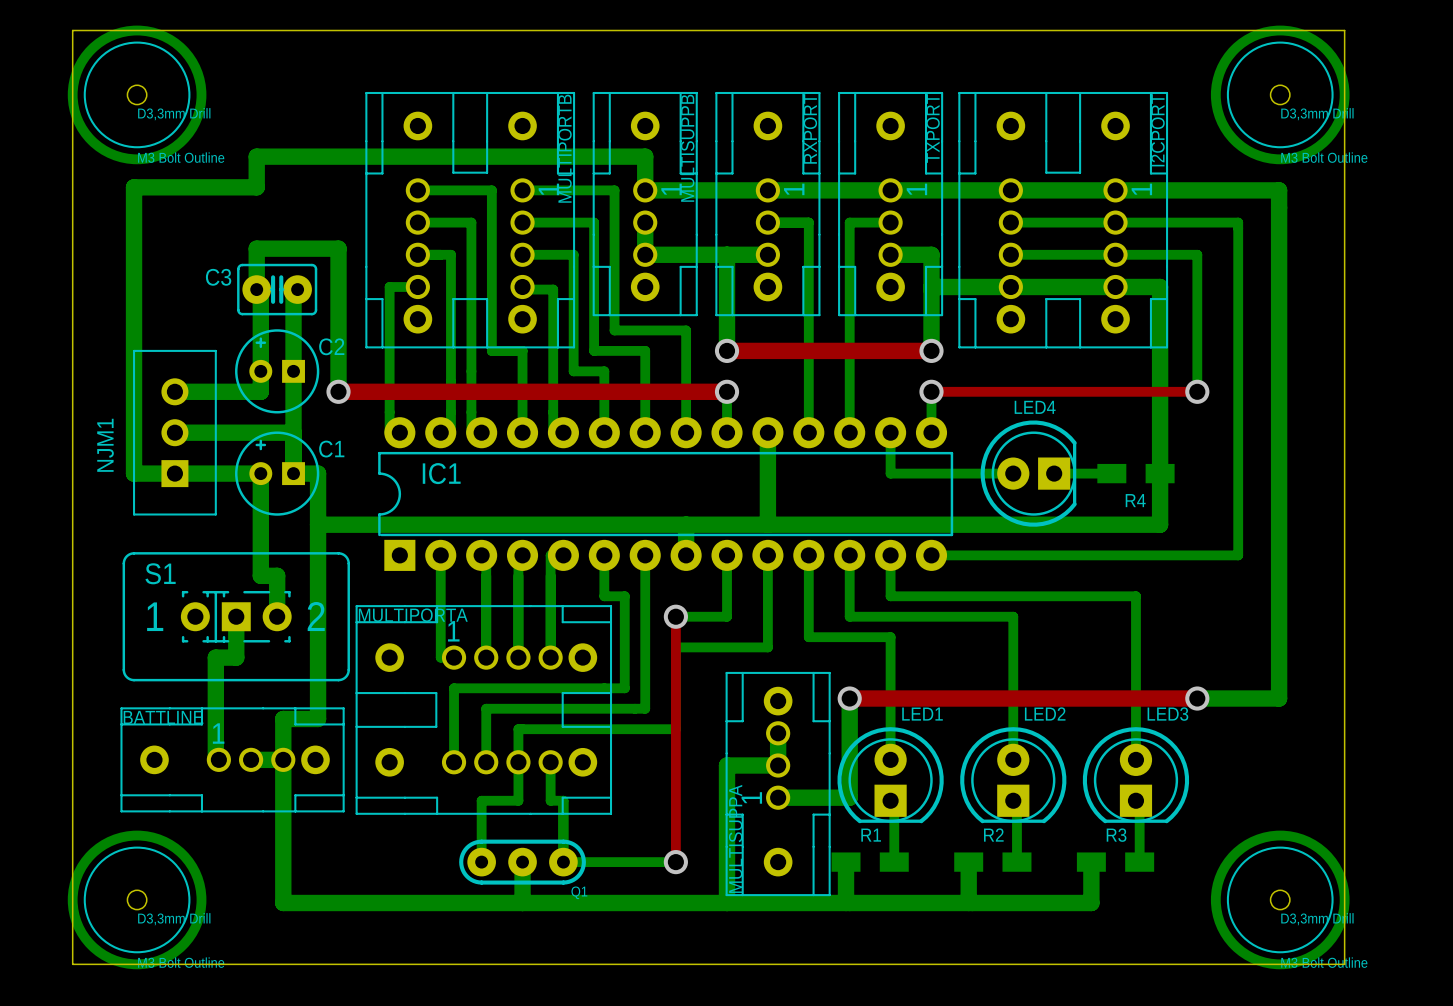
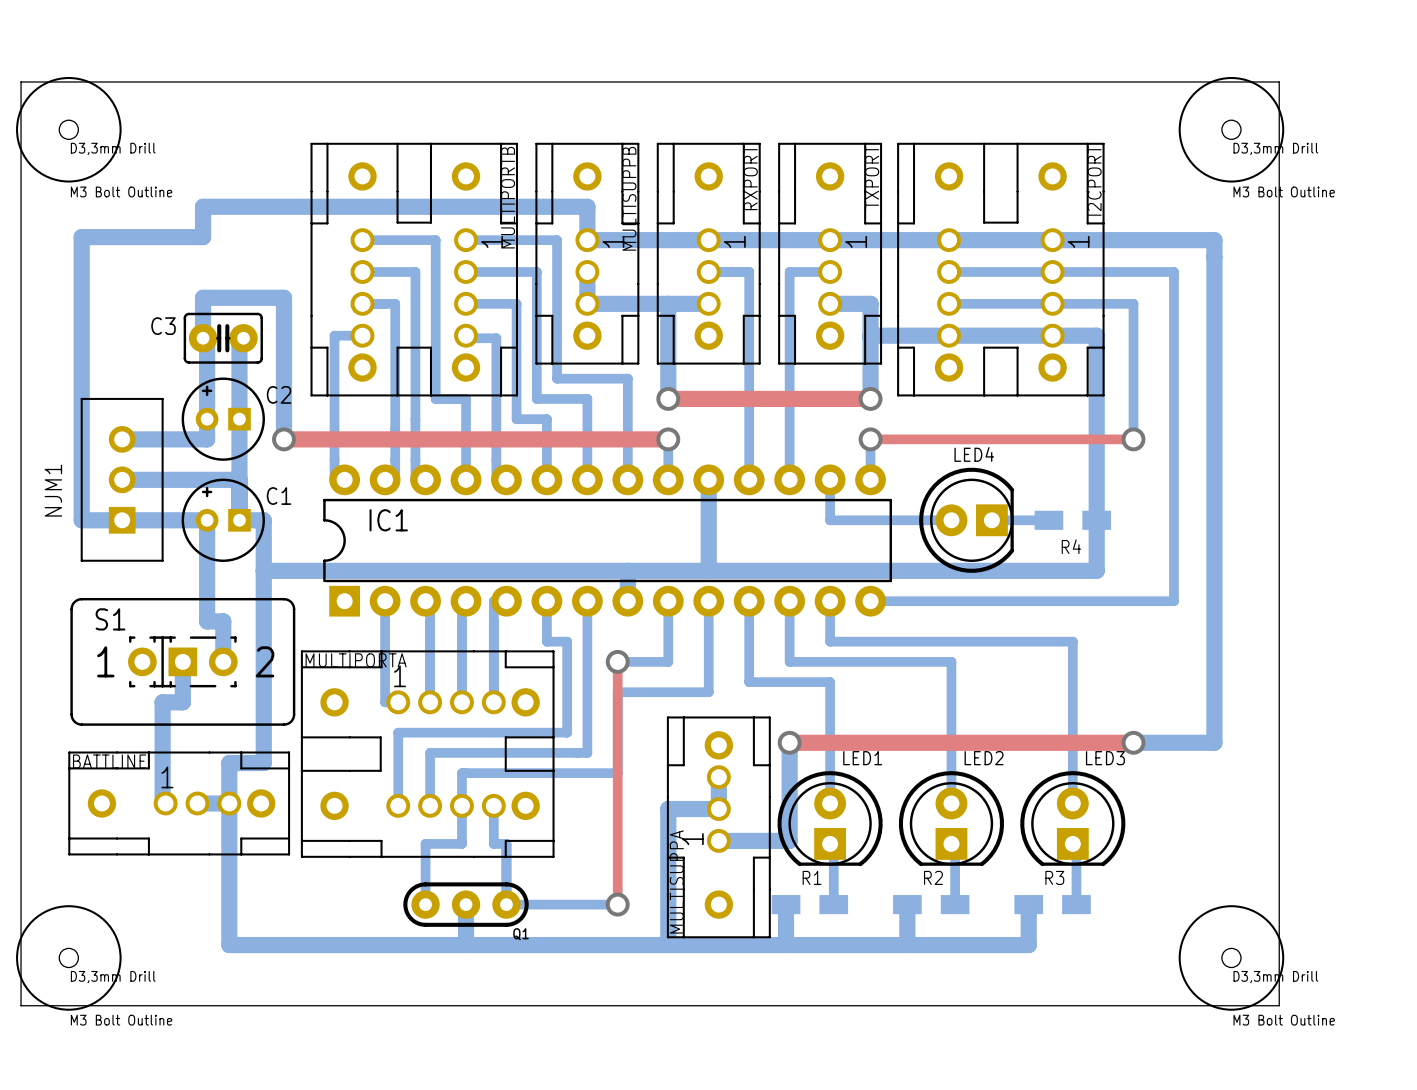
part: none -> (68, 129)
part: none -> (1231, 129)
part: (137, 94) -> none
part: (1280, 94) -> none
part: (137, 899) -> none
part: (1280, 899) -> none
part: none -> (68, 957)
part: none -> (1231, 957)

